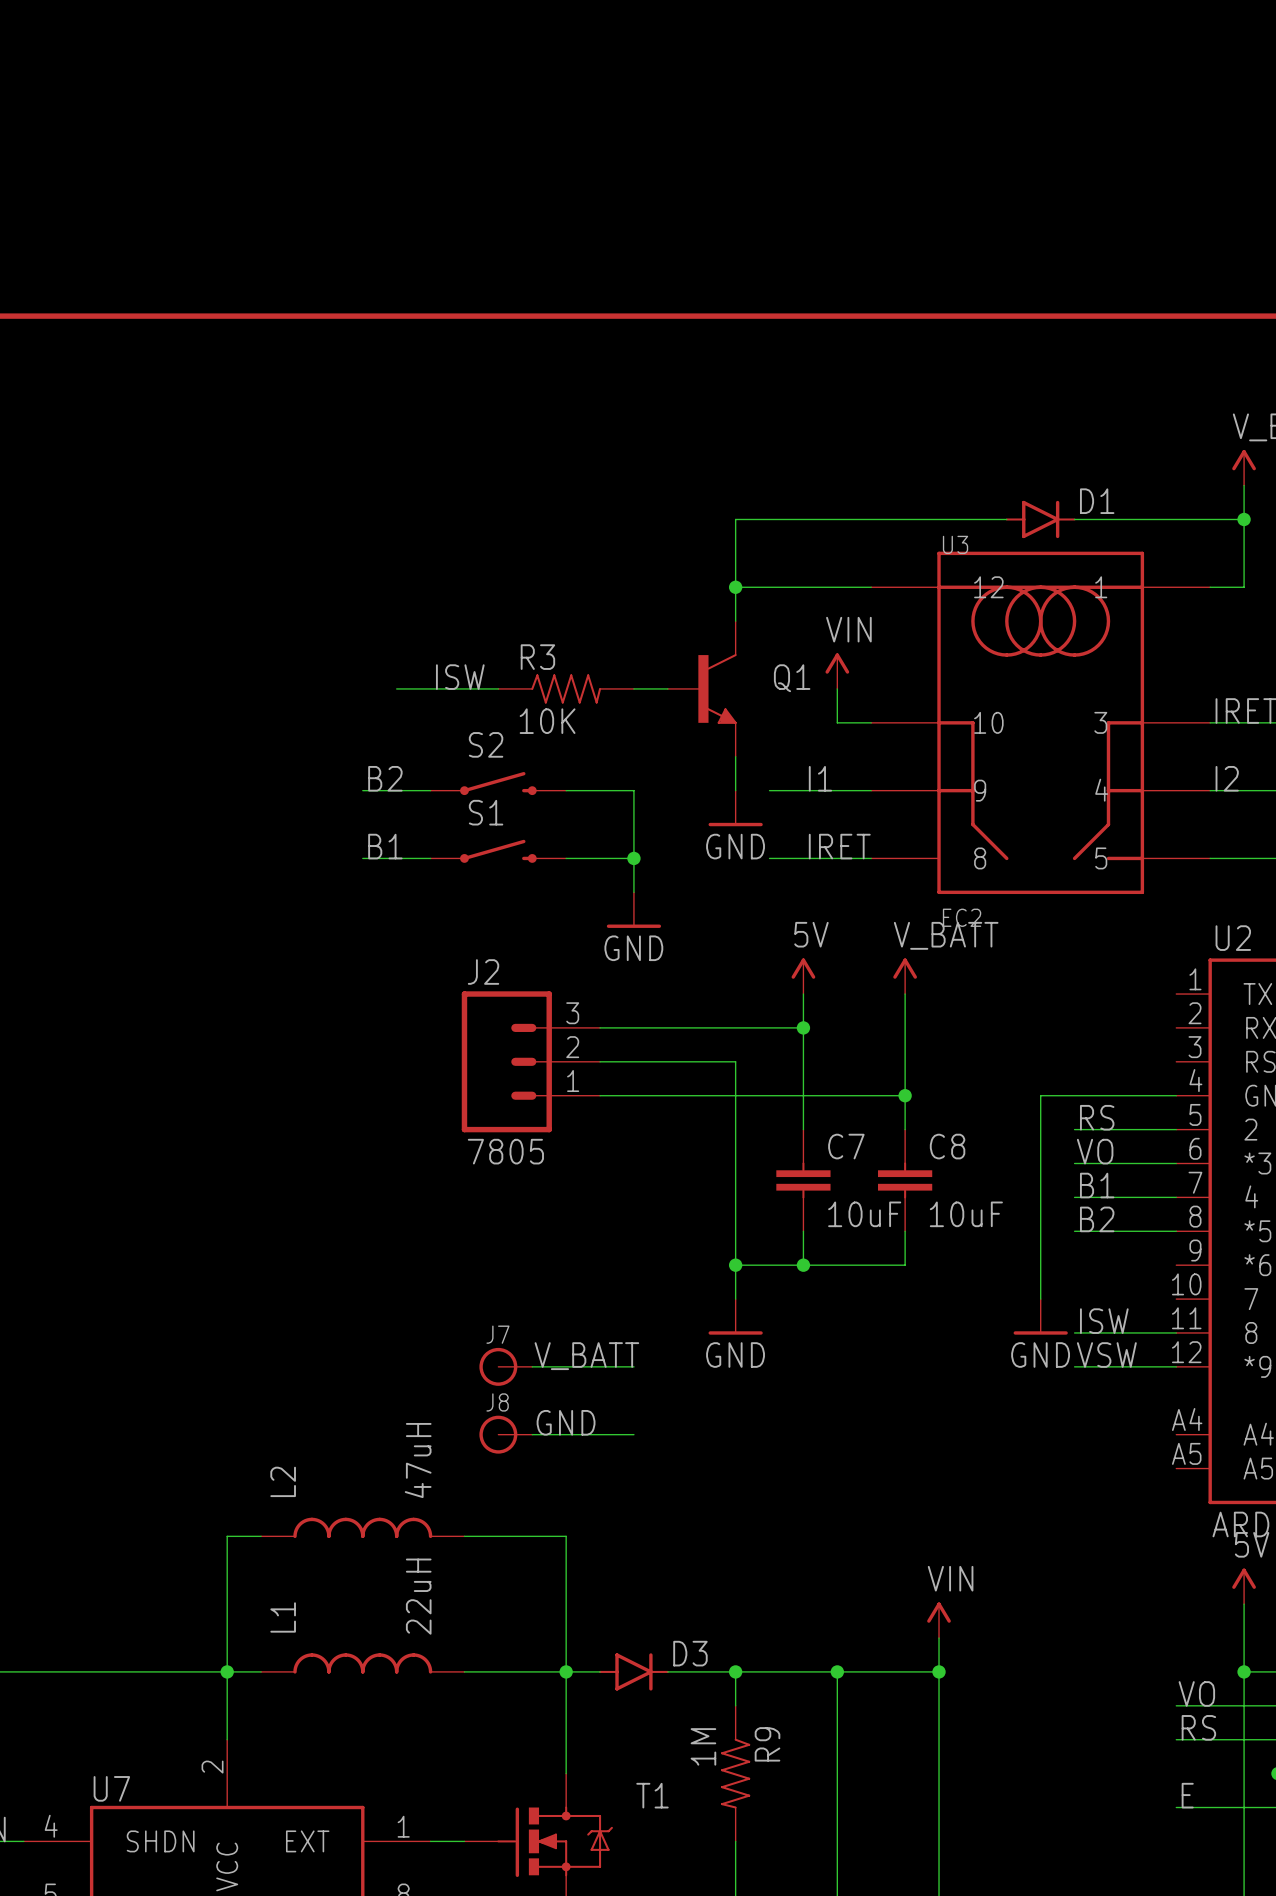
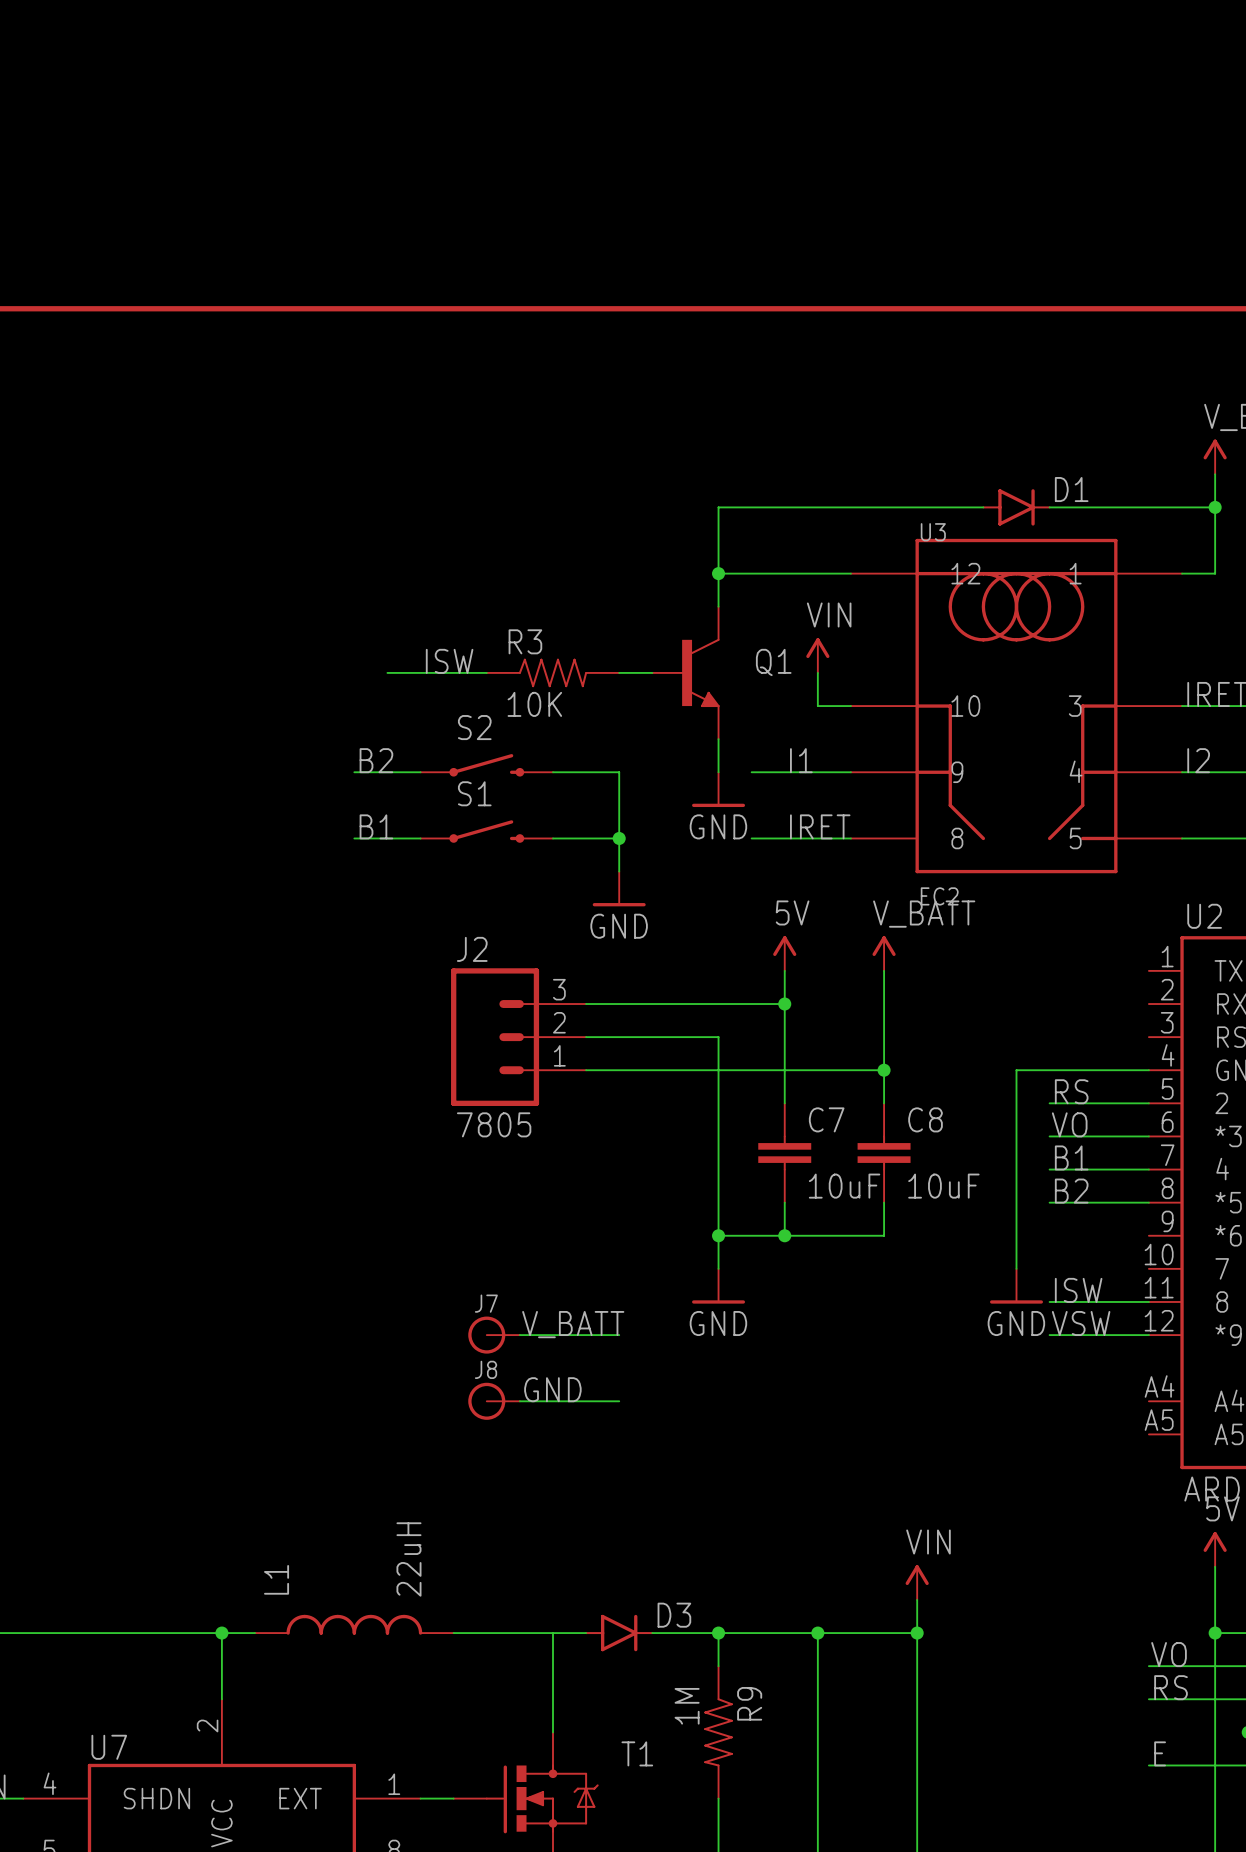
L2: 47uH (362, 1527) -> none
wire: (261, 1536) (227, 1536) (227, 1671) -> none
wire: (464, 1536) (566, 1536) (566, 1671) -> none
junction: (566, 1671) -> none

